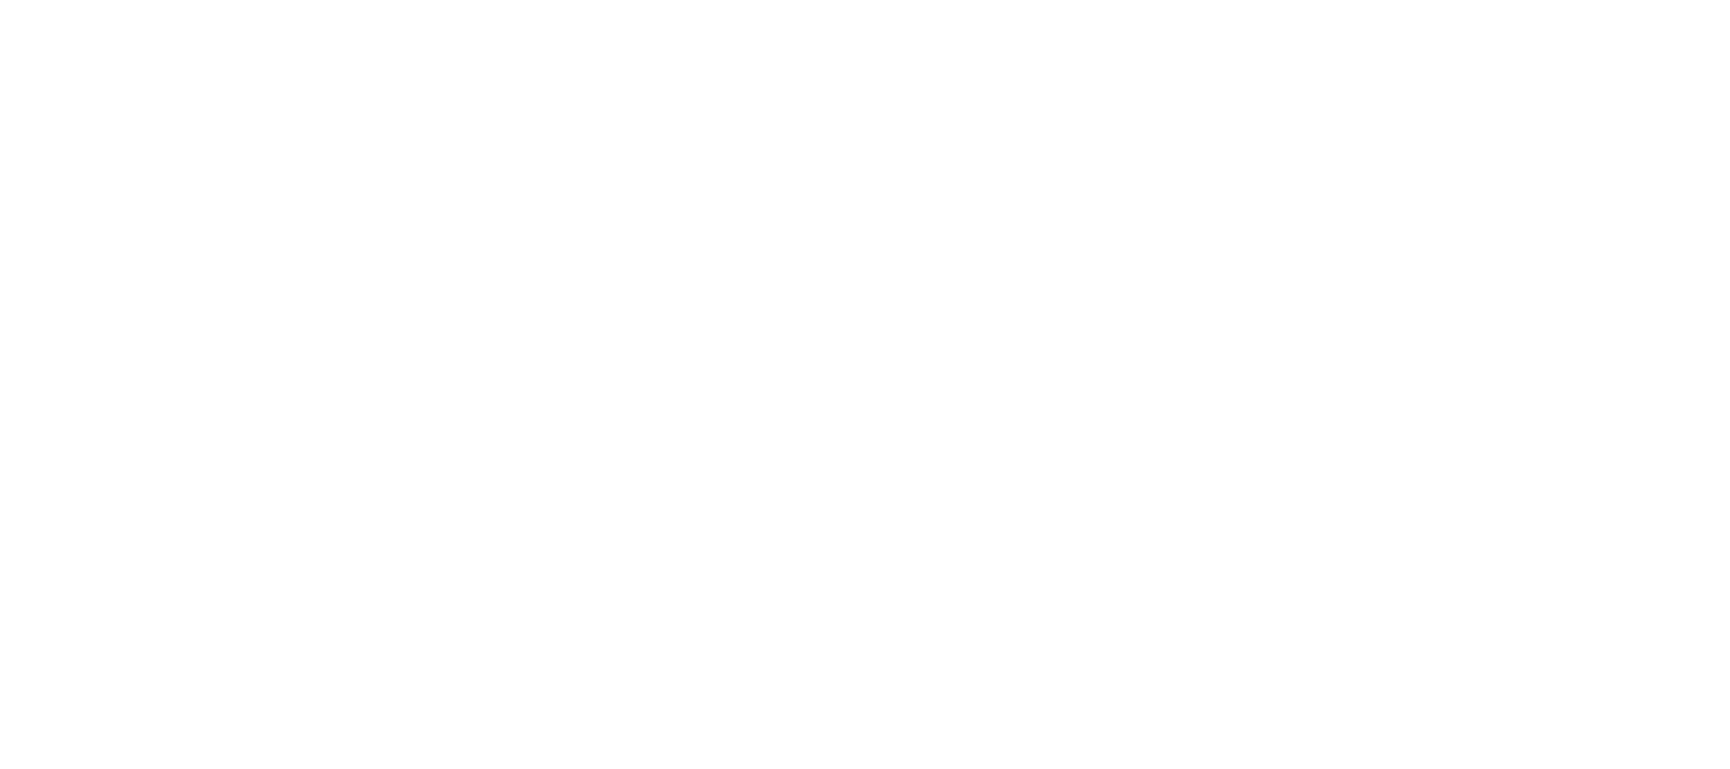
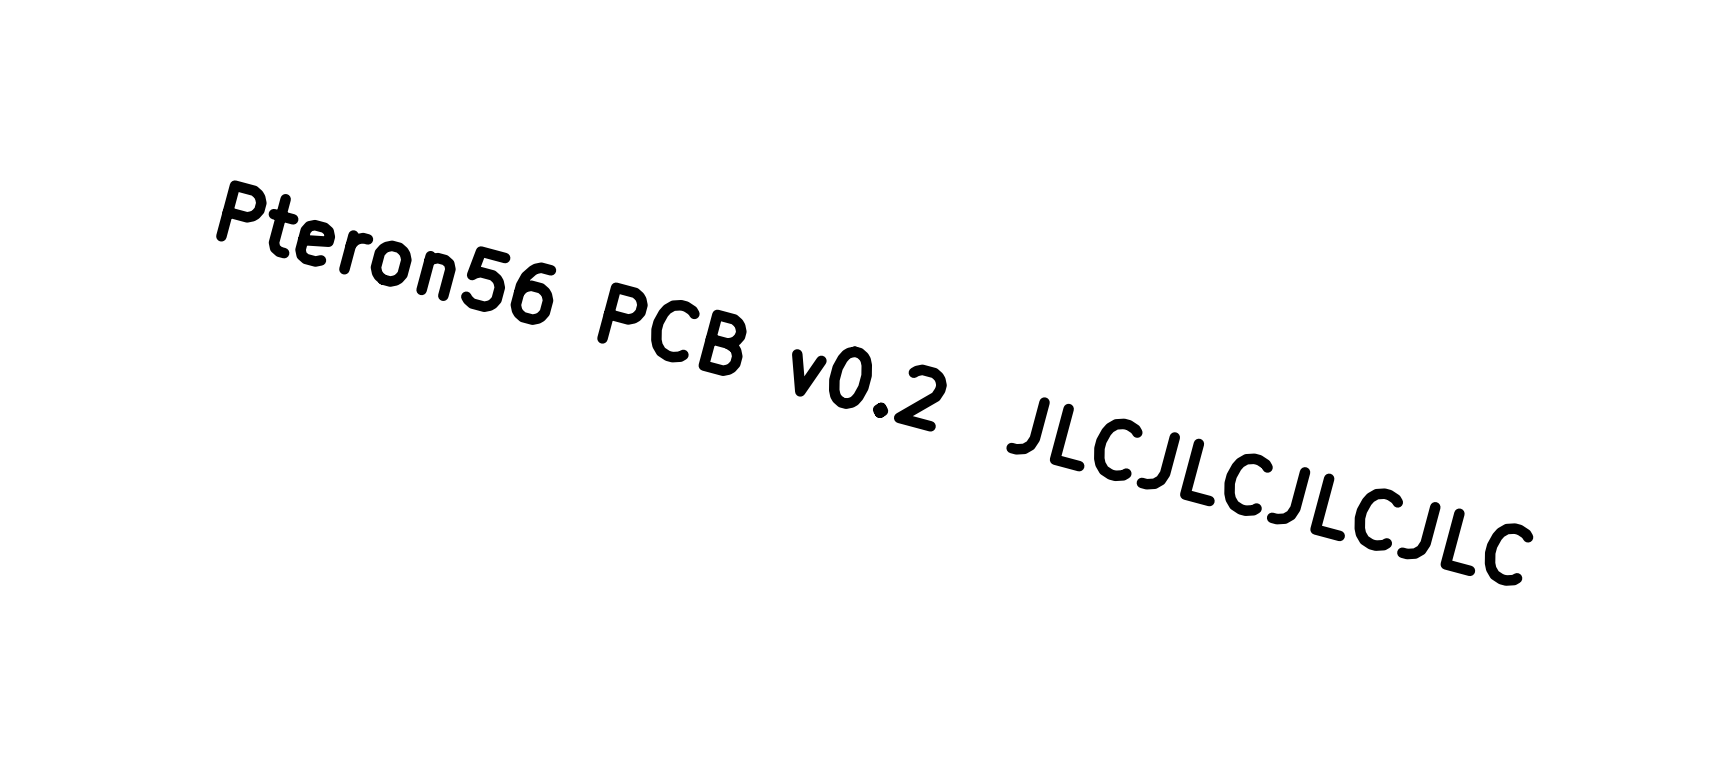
text: none -> Pteron56 PCB v0.2 (581, 305)
text: none -> JLCJLCJLCJLC (1269, 491)

